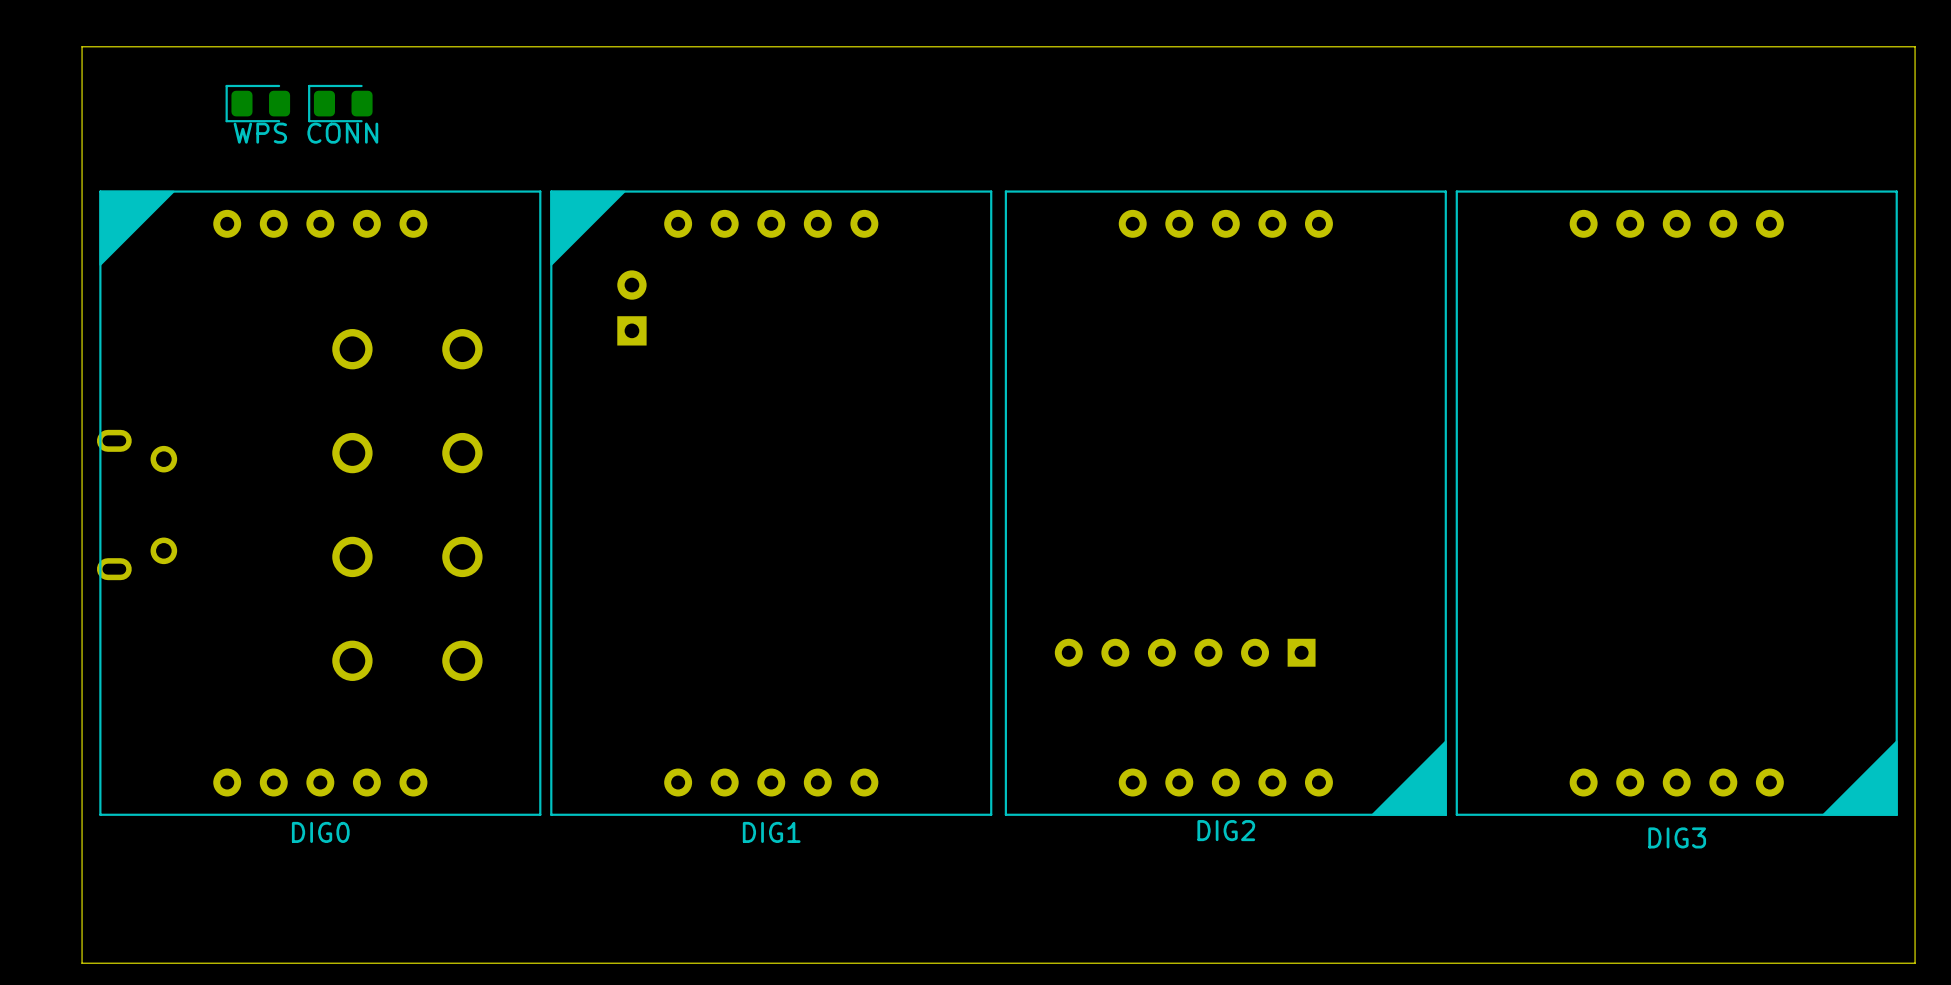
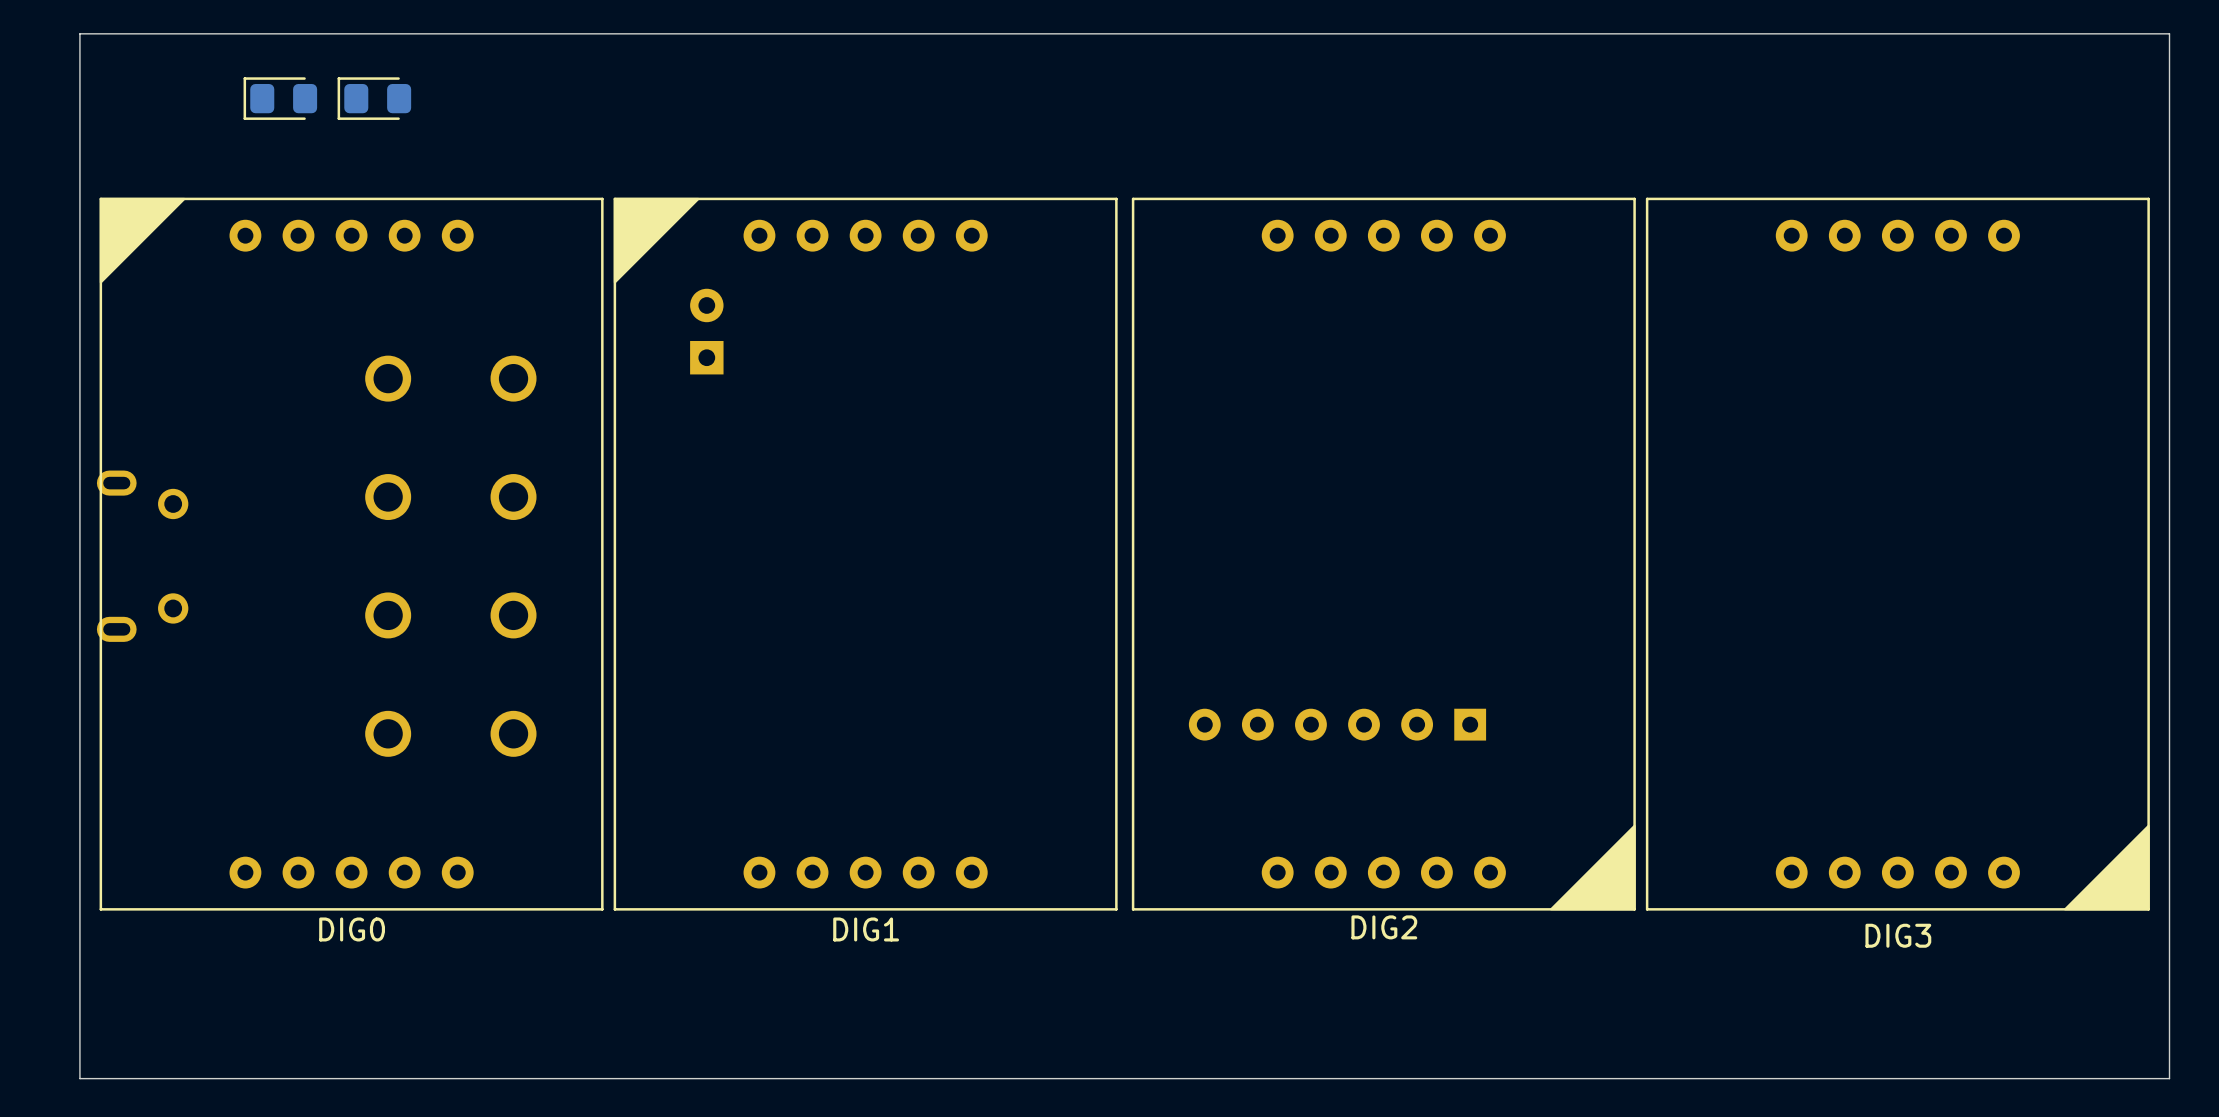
part value: WPS (260, 133) -> none
part value: CONN (342, 133) -> none

